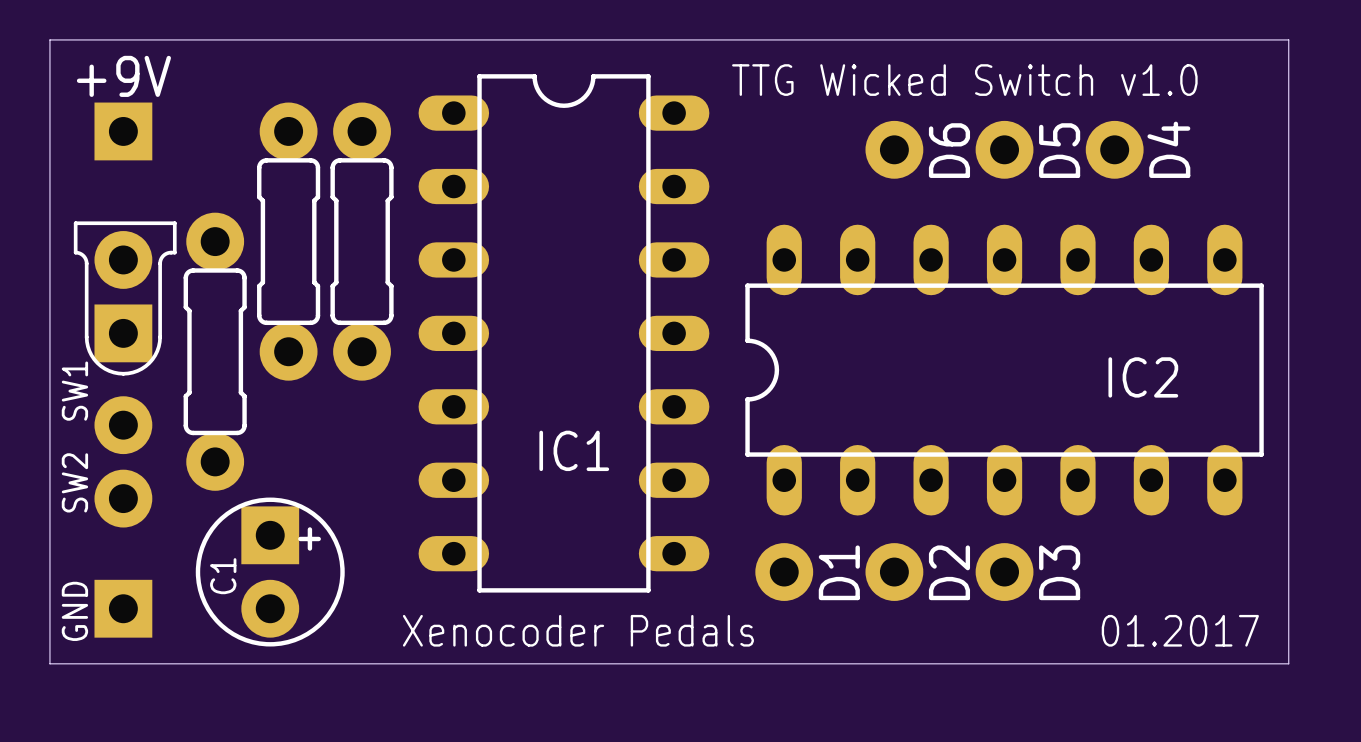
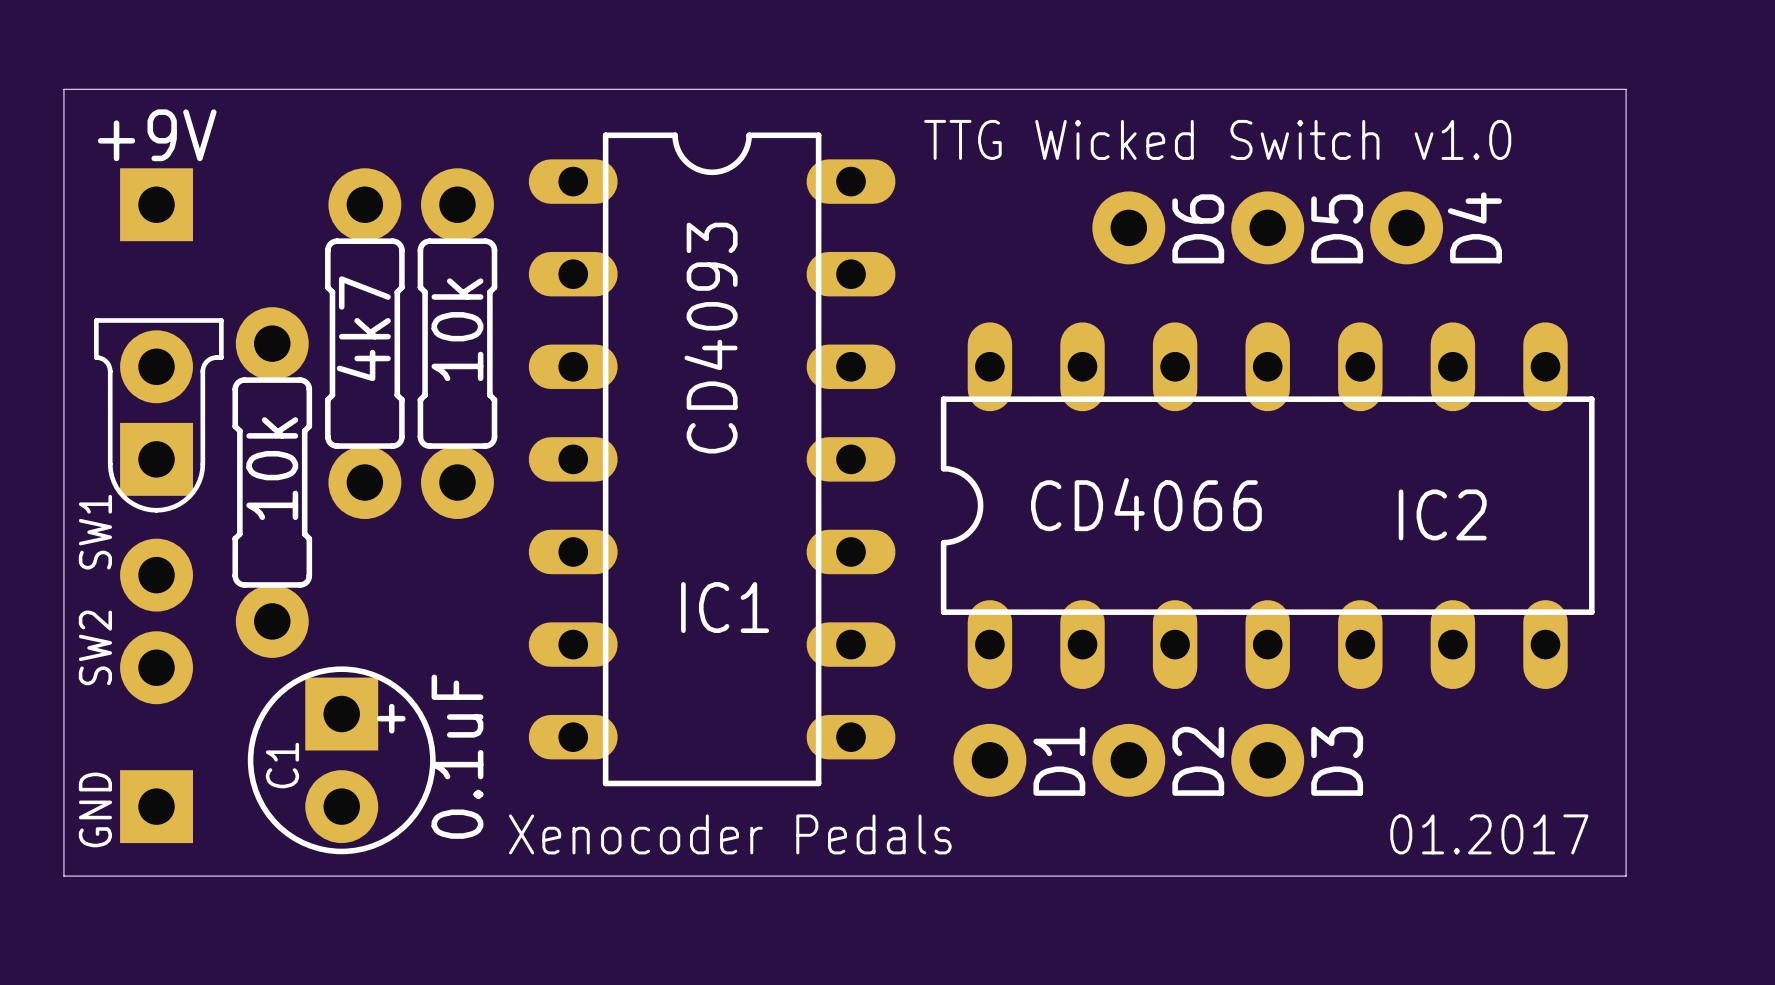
part value: none -> 4k7 (363, 328)
part value: none -> 10k (457, 329)
IC1 value: none -> CD4093 (711, 338)
part value: none -> 10k (272, 468)
IC2 value: none -> CD4066 (1146, 504)
C1 value: none -> 0.1uF (457, 756)

